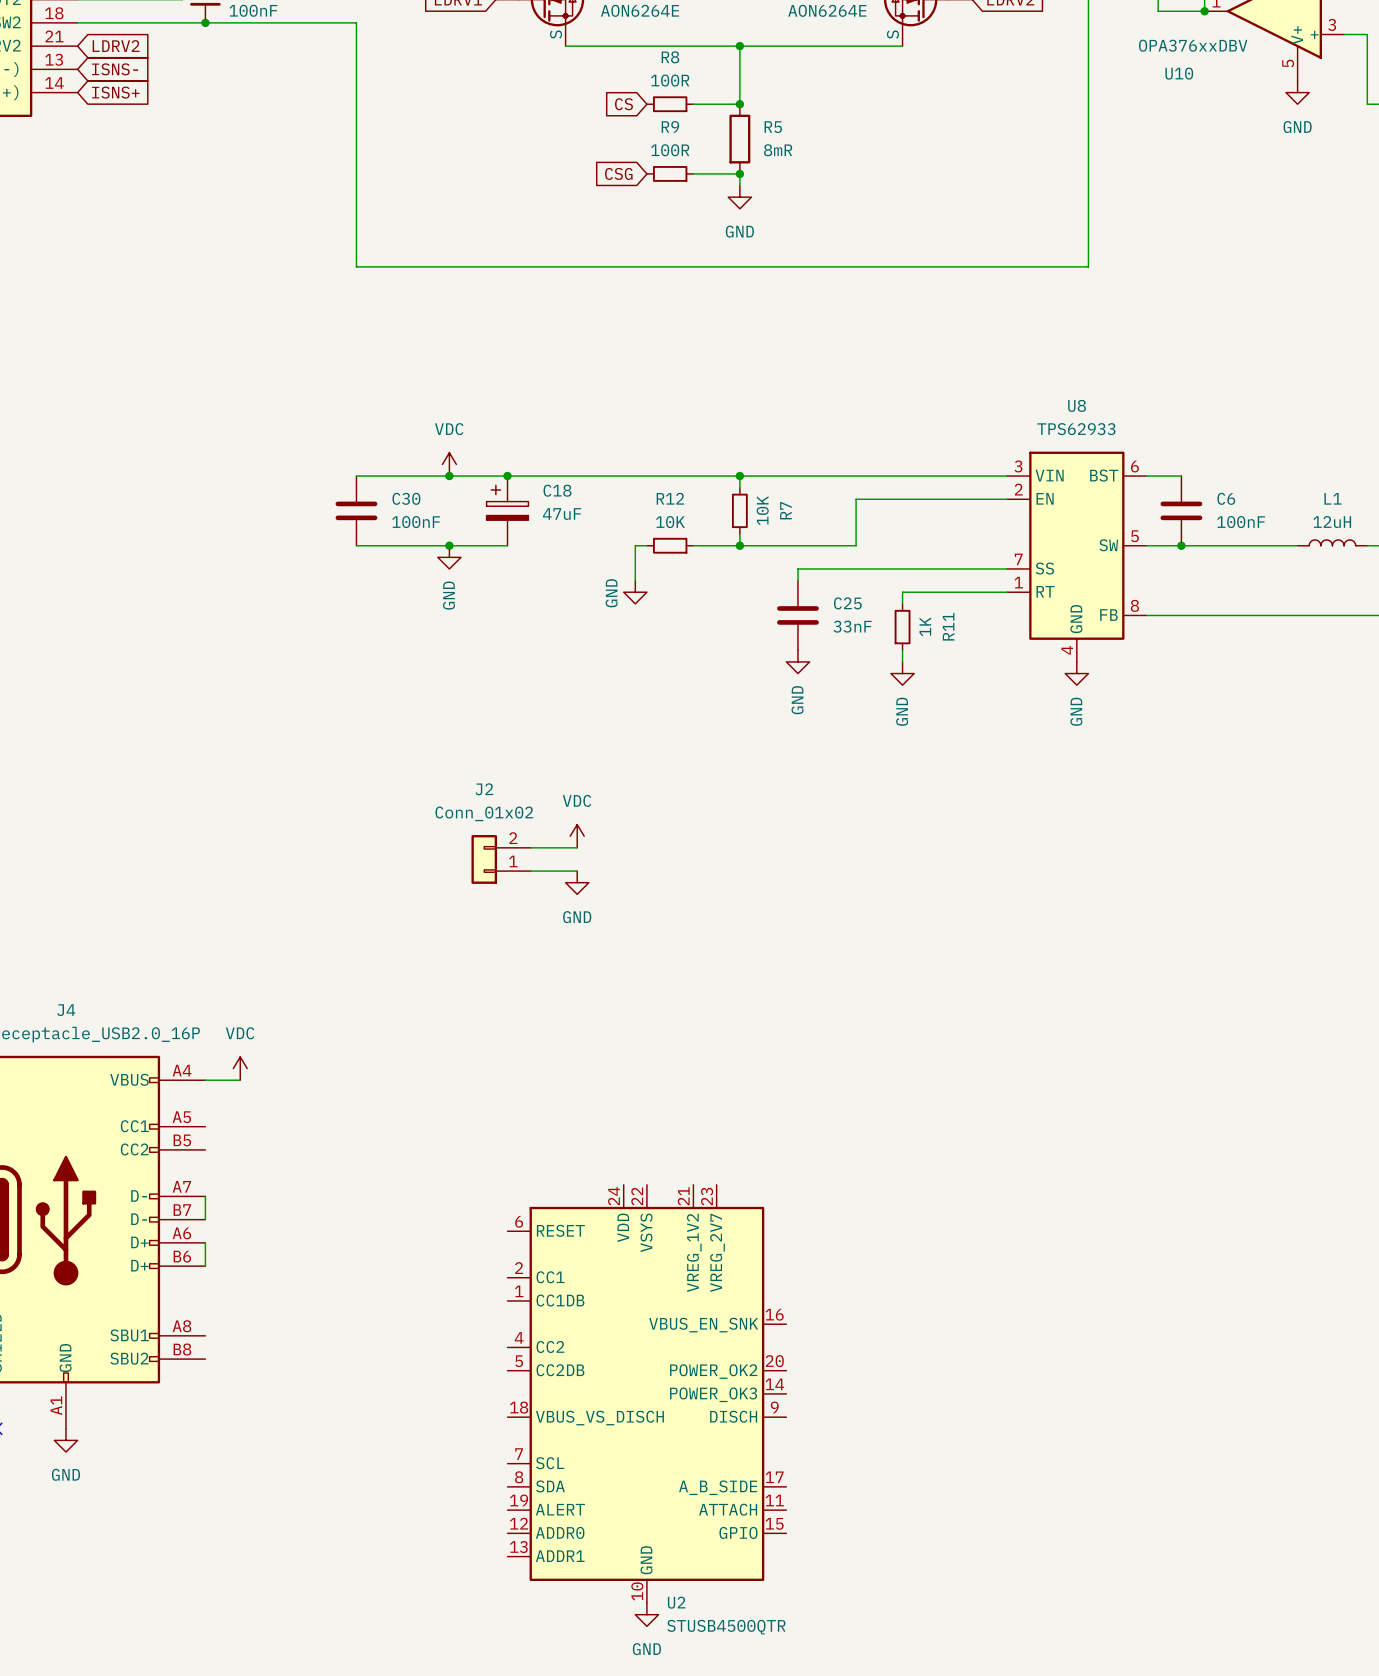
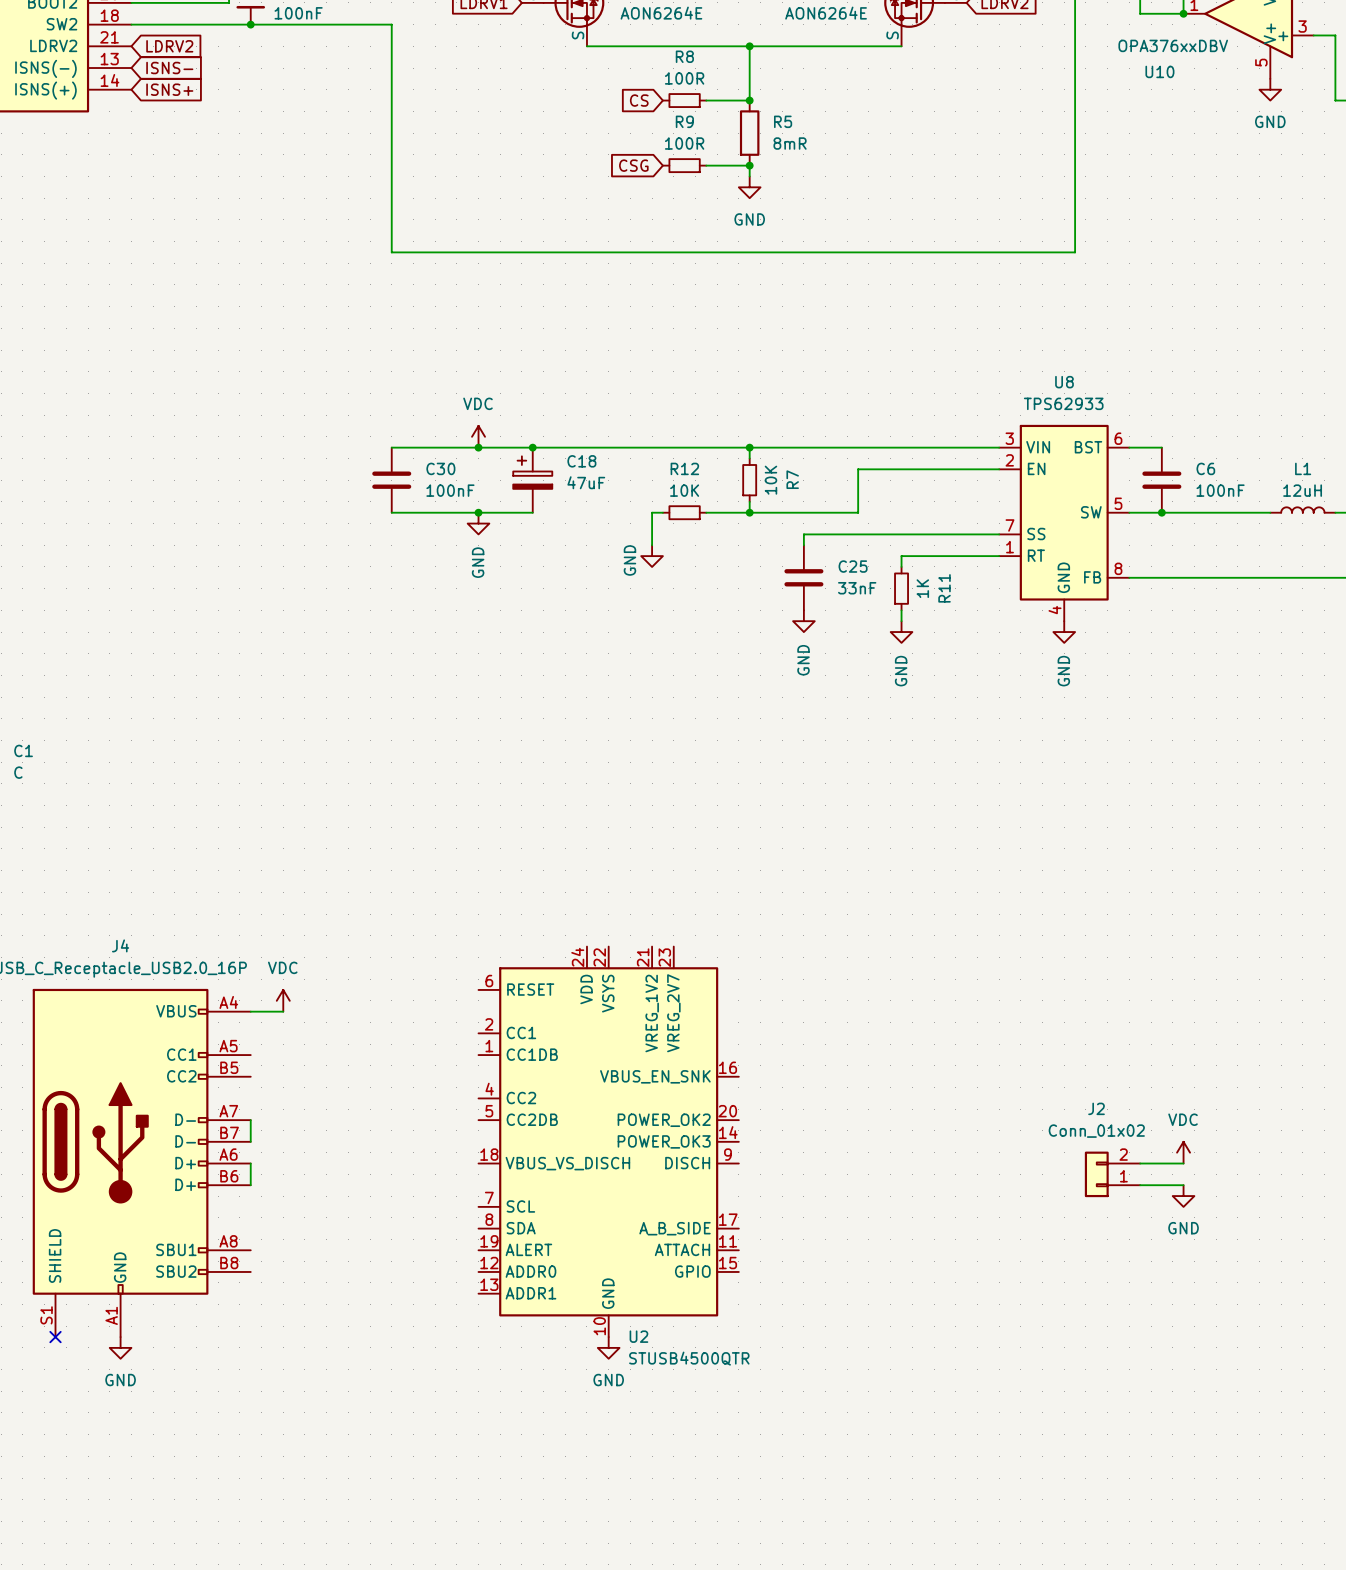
power symbol: VDC (577, 836) -> none
wire: (530, 847) (577, 847) -> none
J2 position: (501, 859) -> (1112, 1174)
wire: (530, 871) (577, 871) -> none
power symbol: GND (577, 882) -> none
power symbol: none -> VDC (1183, 1152)
wire: none -> (1140, 1163) (1183, 1163)
wire: none -> (1140, 1185) (1183, 1185)
power symbol: none -> GND (1183, 1196)
U2 position: (646, 1393) -> (608, 1141)
power symbol position: GND (646, 1614) -> GND (608, 1347)

